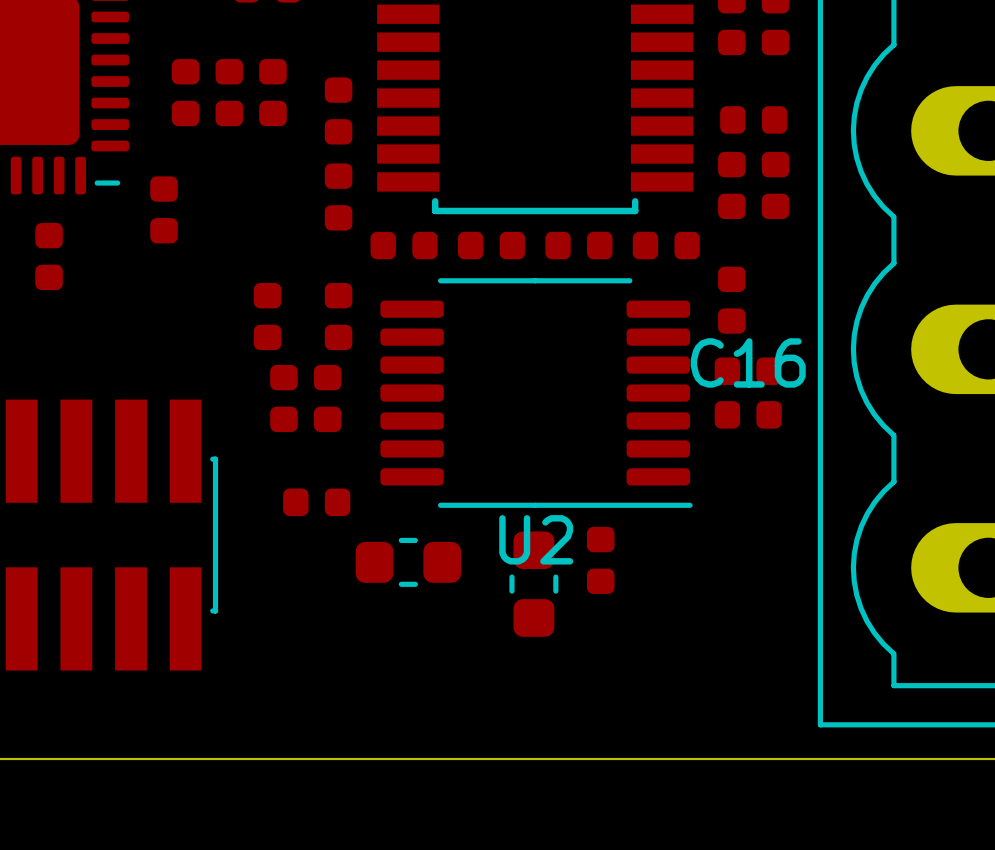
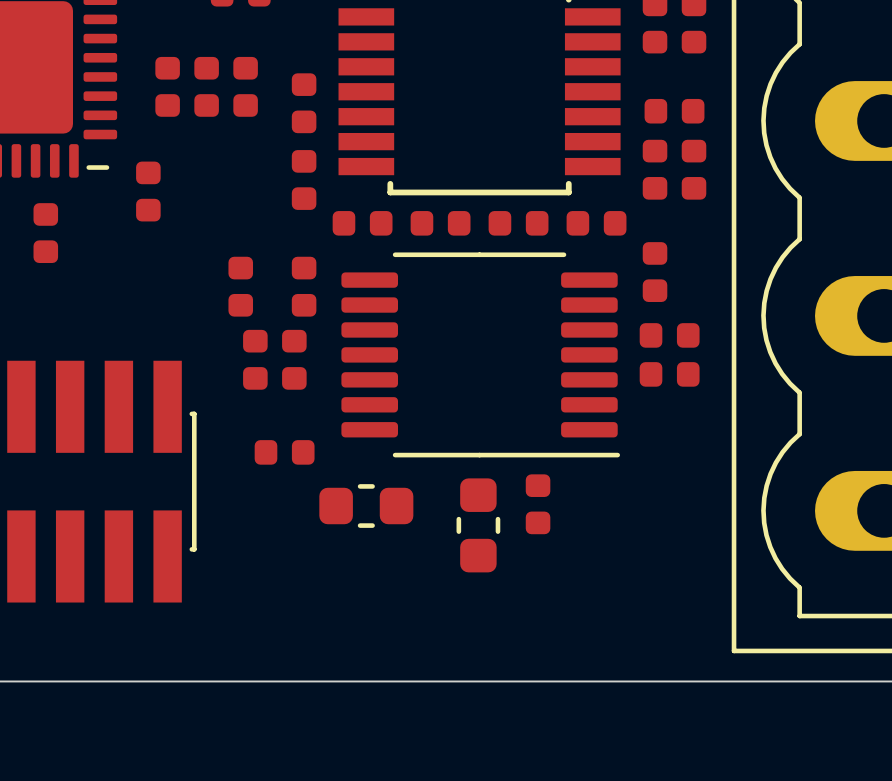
C16 name: C16 (748, 362) -> none
U2 name: U2 (536, 539) -> none

